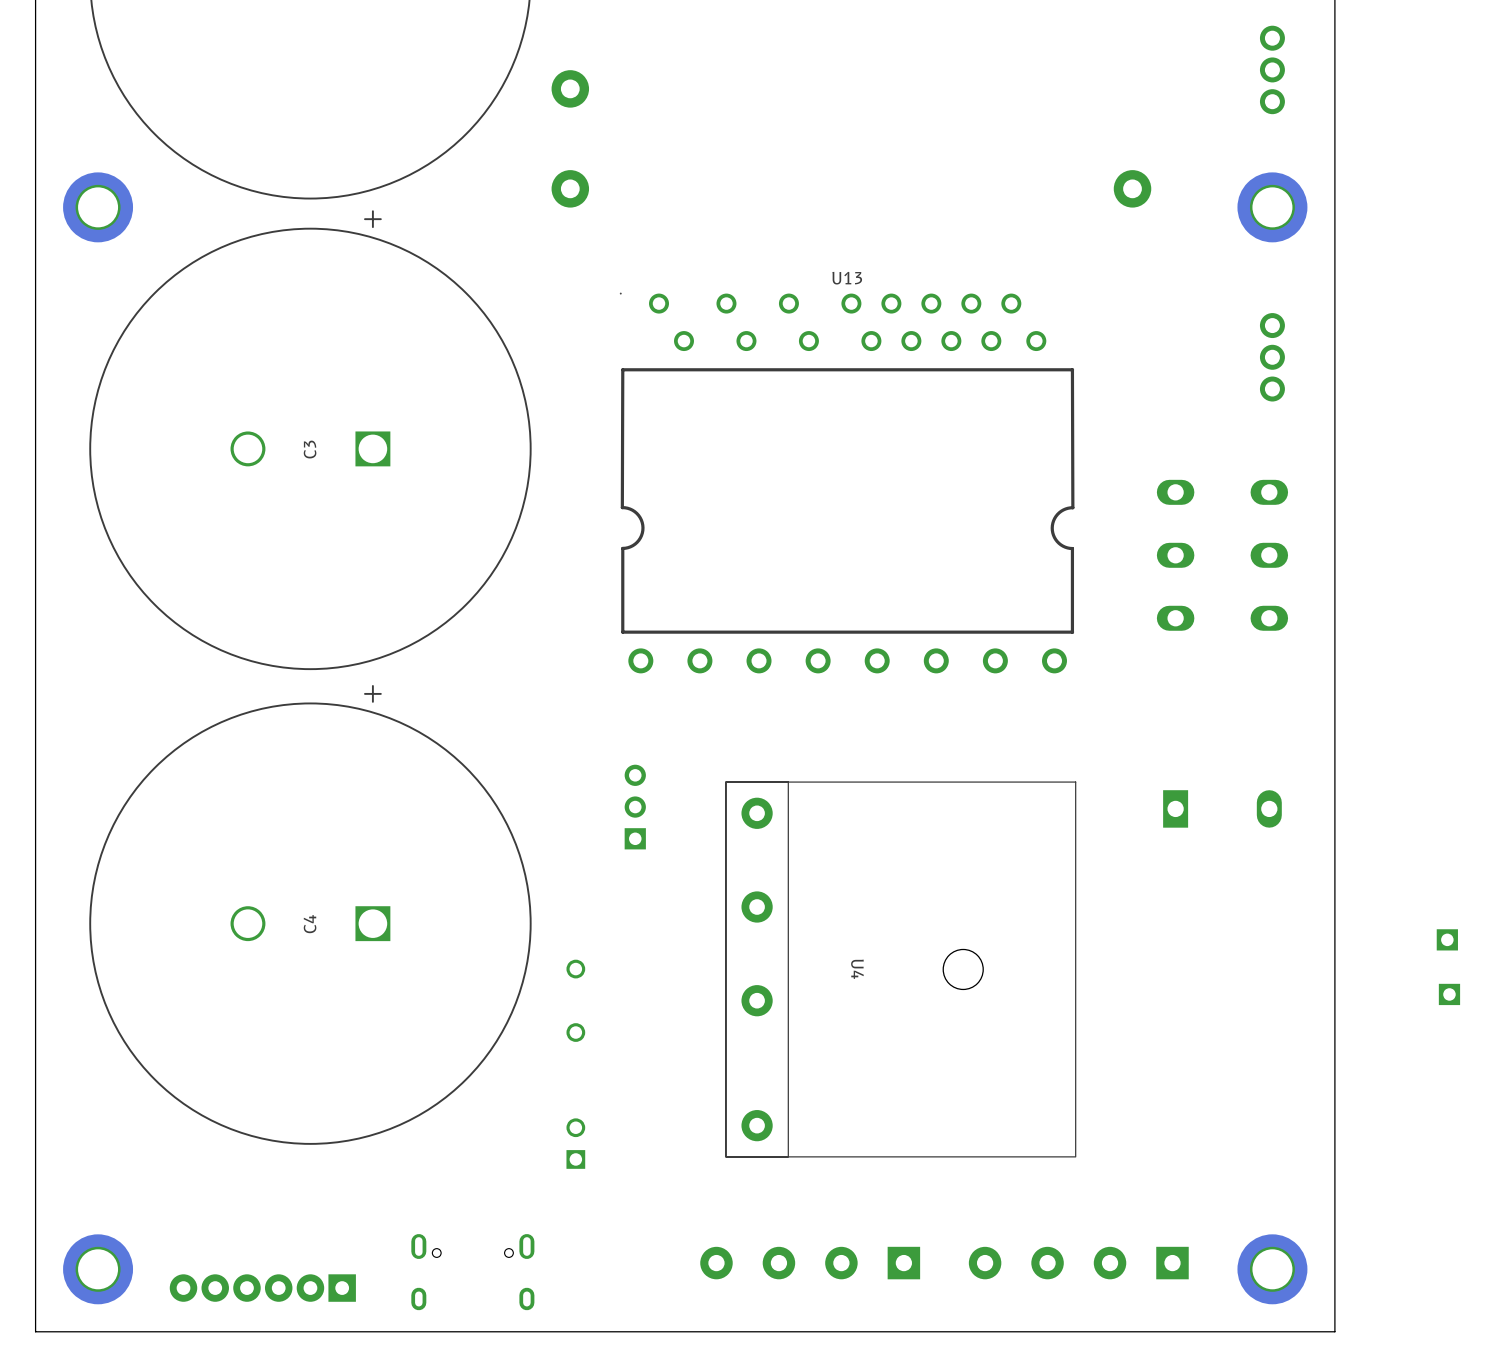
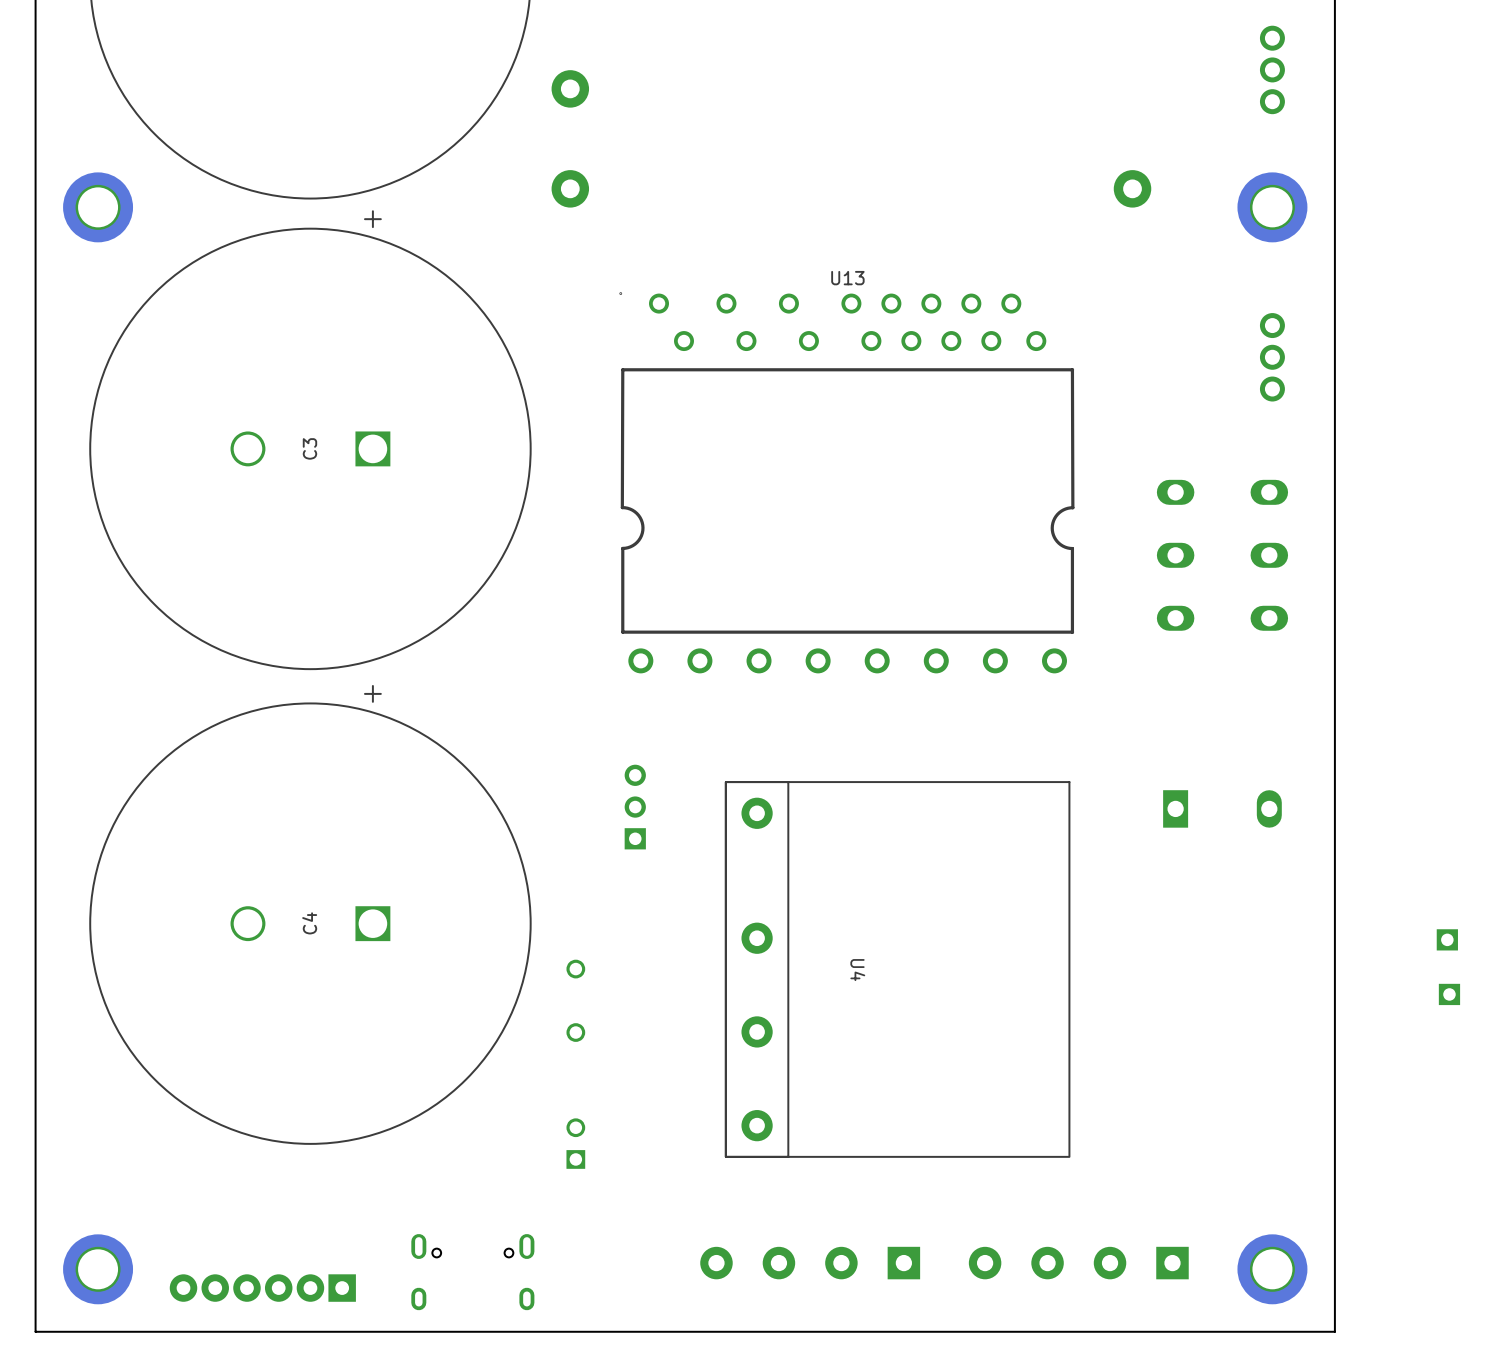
U4 footprint: [725, 781, 1077, 1158] -> [725, 781, 1071, 1158]

